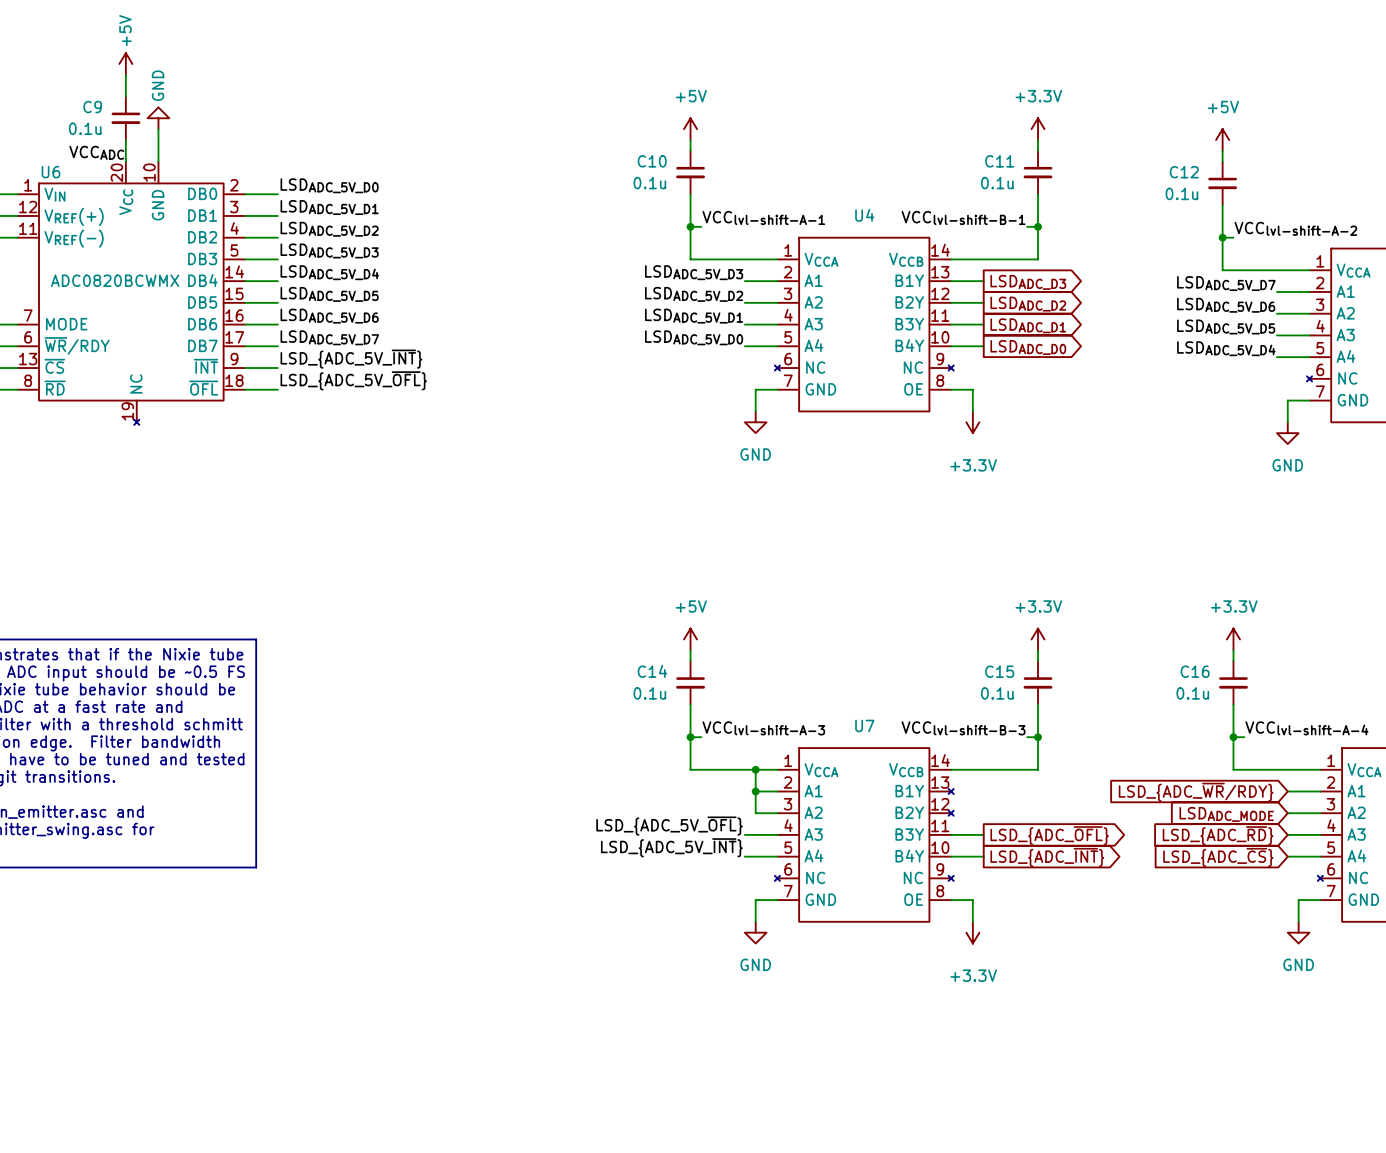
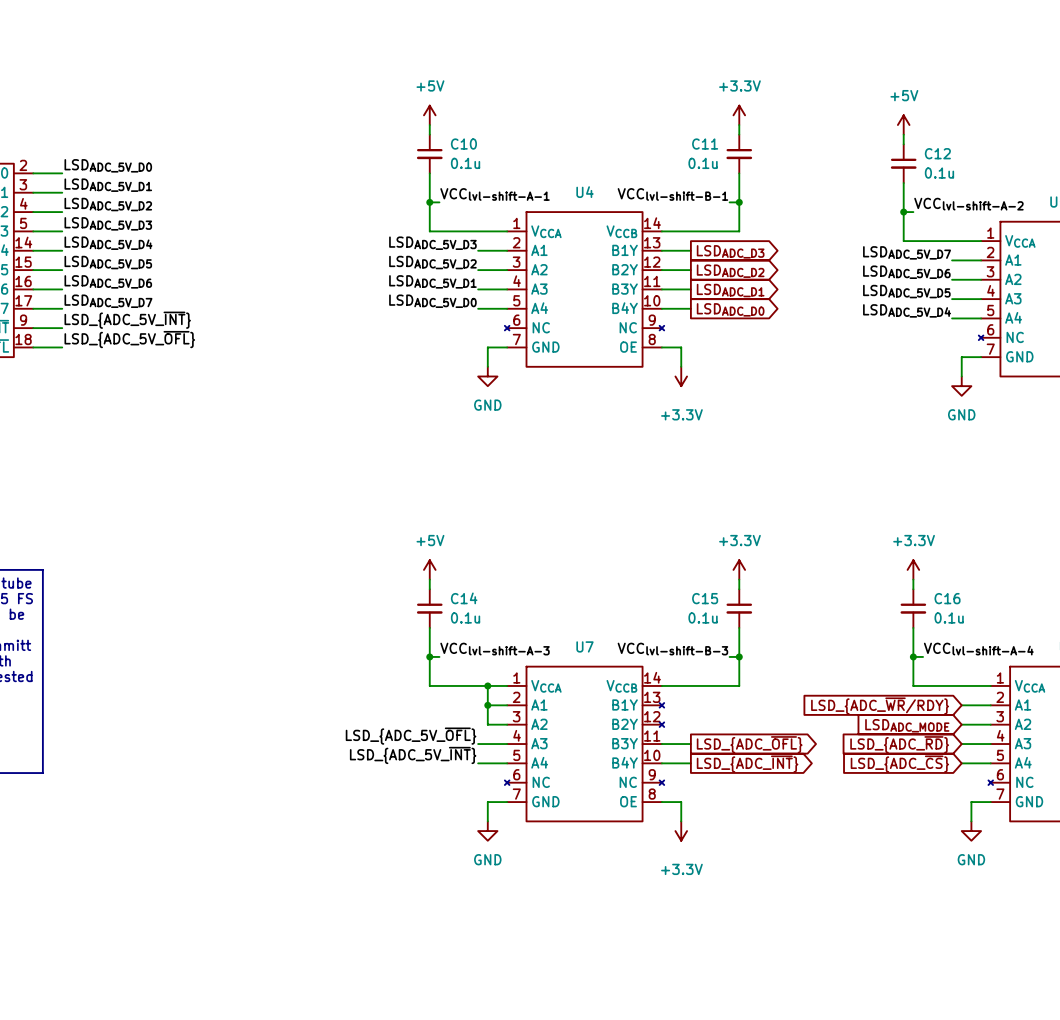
C10 name position: C10 (652, 161) -> C10 (463, 144)
C12 name position: C12 (1184, 172) -> C12 (937, 153)
C10 value position: 0.1u (649, 183) -> 0.1u (465, 163)
C12 value position: 0.1u (1181, 193) -> 0.1u (939, 173)
C14 name position: C14 (652, 671) -> C14 (464, 598)
C16 name position: C16 (1195, 671) -> C16 (947, 598)
C14 value position: 0.1u (649, 693) -> 0.1u (465, 617)
C16 value position: 0.1u (1192, 693) -> 0.1u (949, 617)

